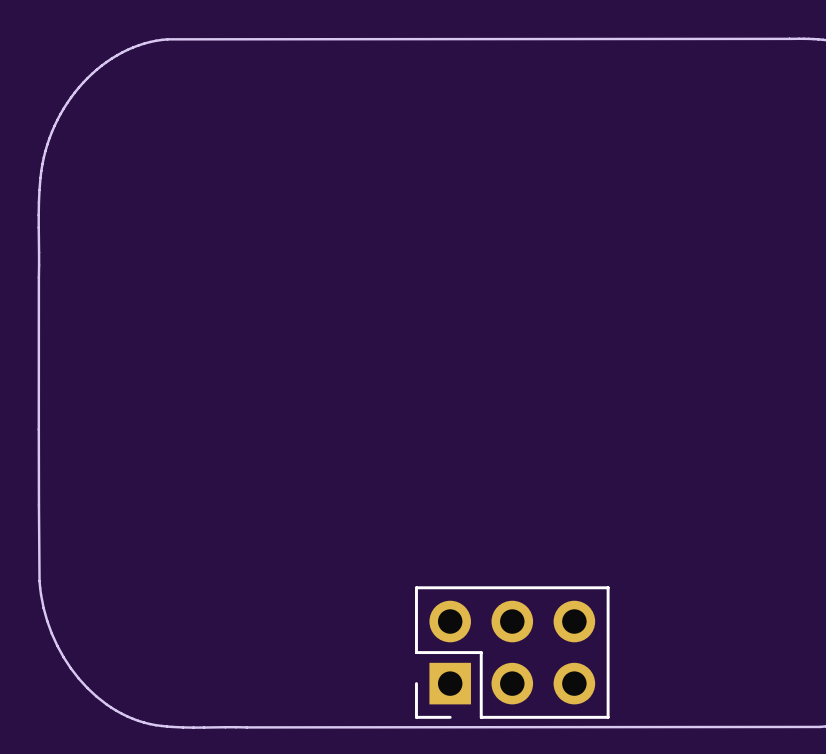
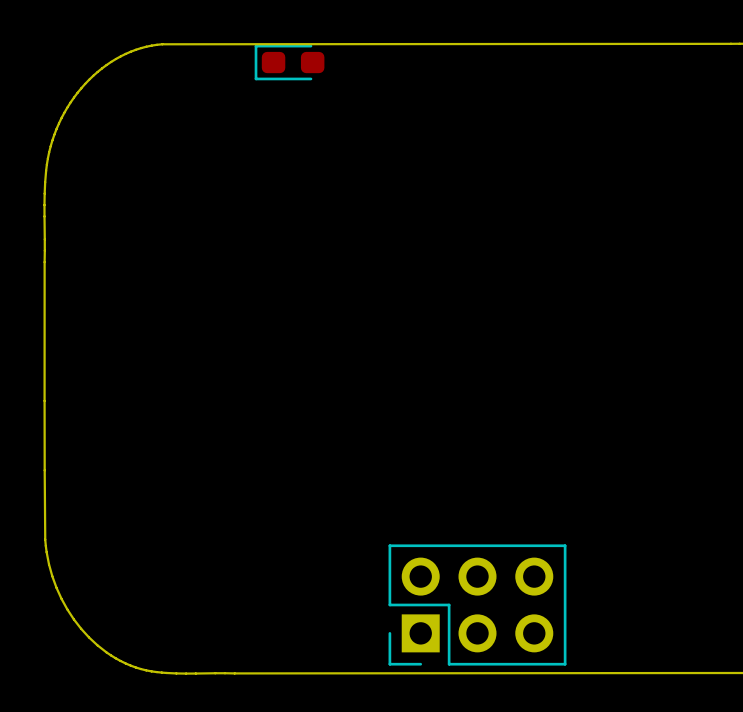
part: none -> (289, 62)

